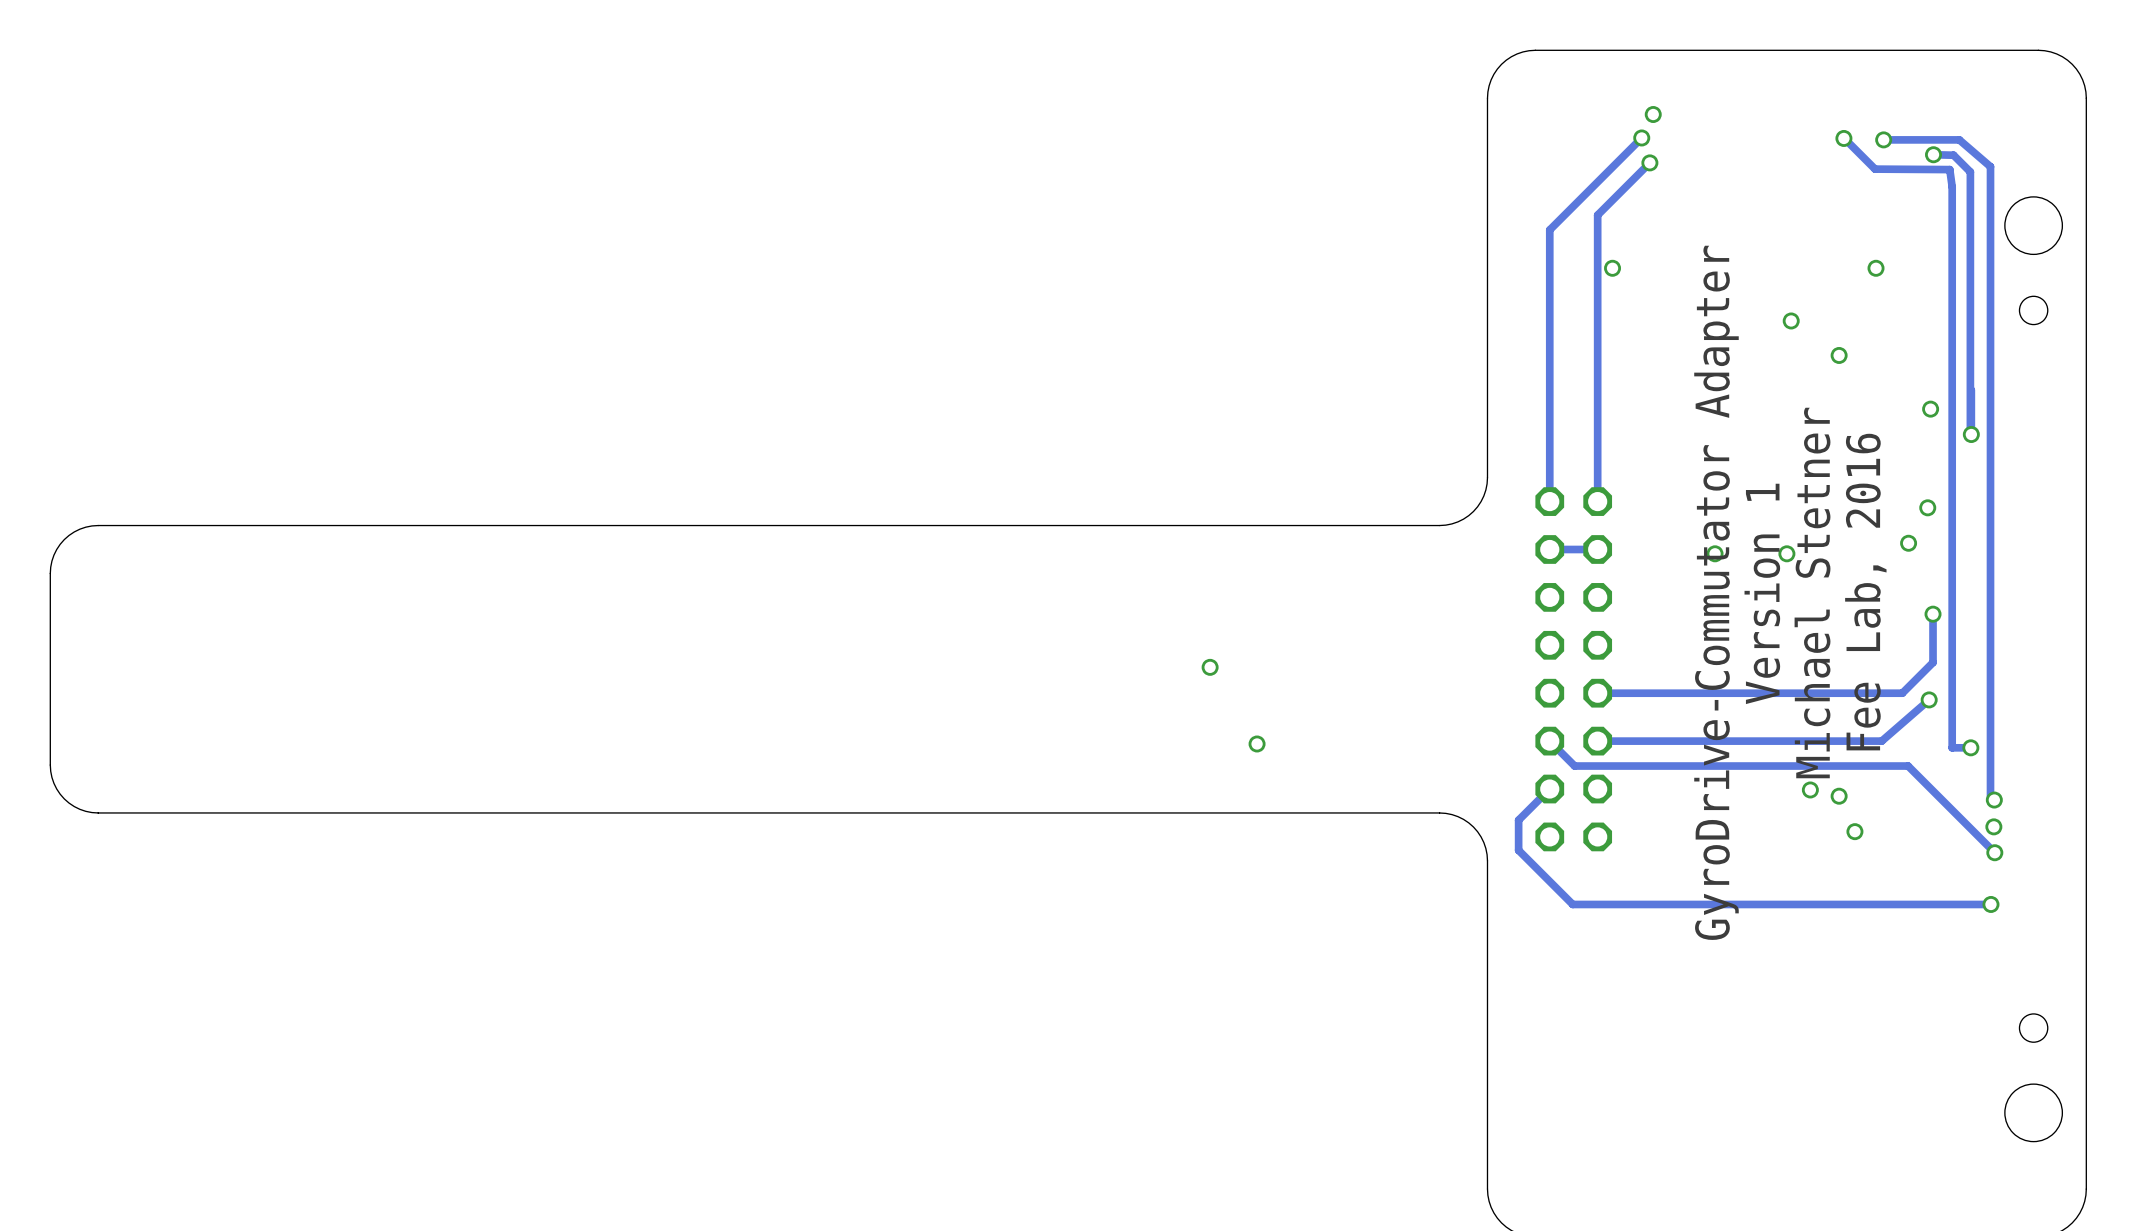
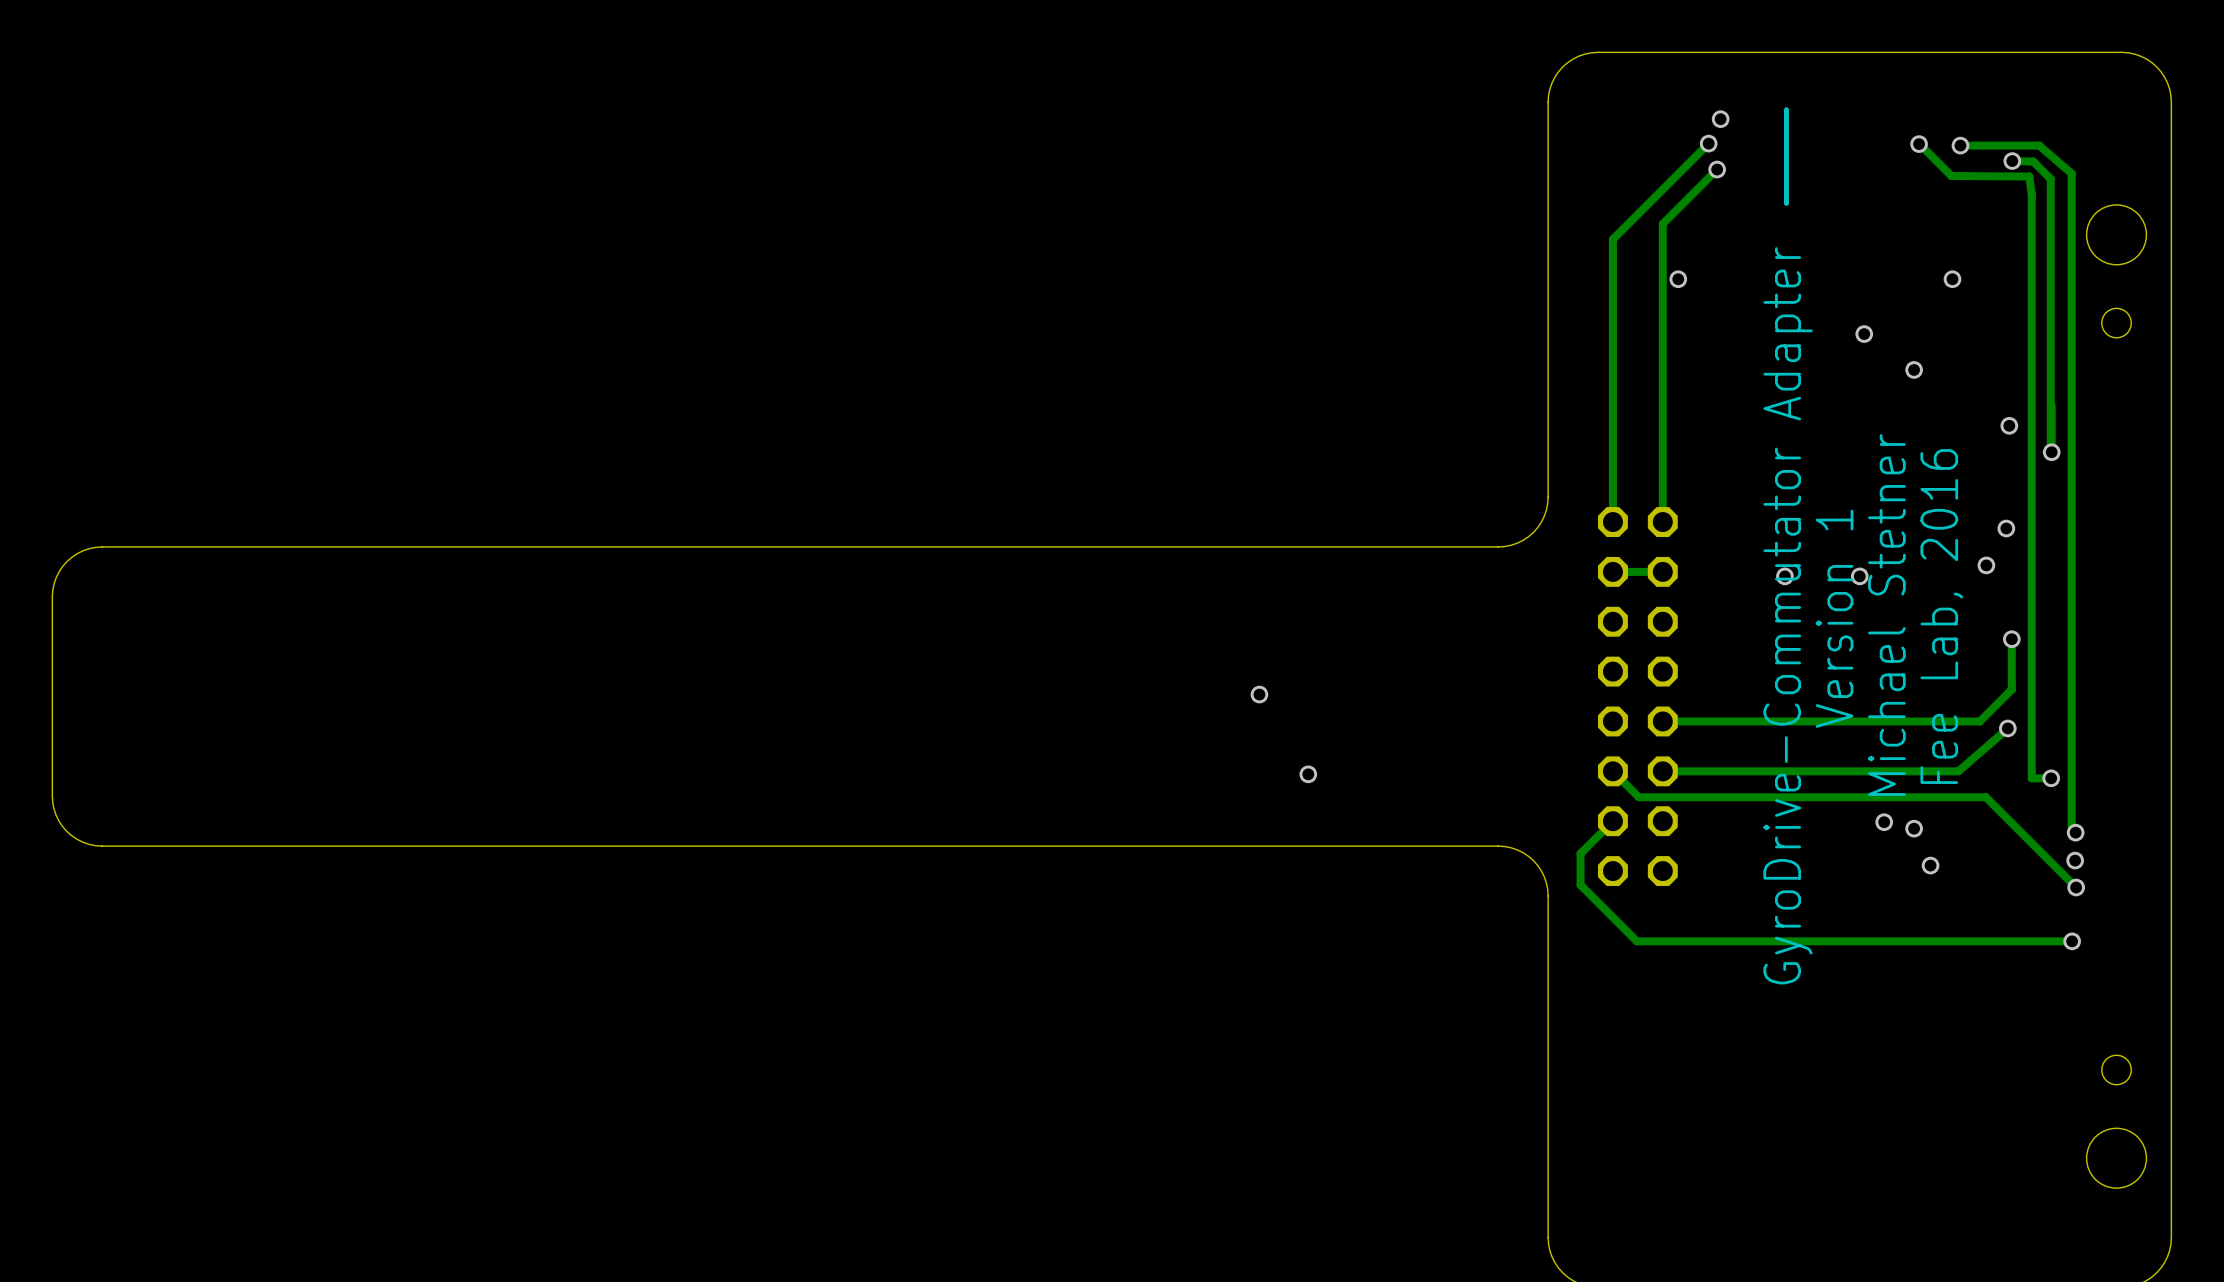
line: none -> (1786, 109) (1786, 203)

